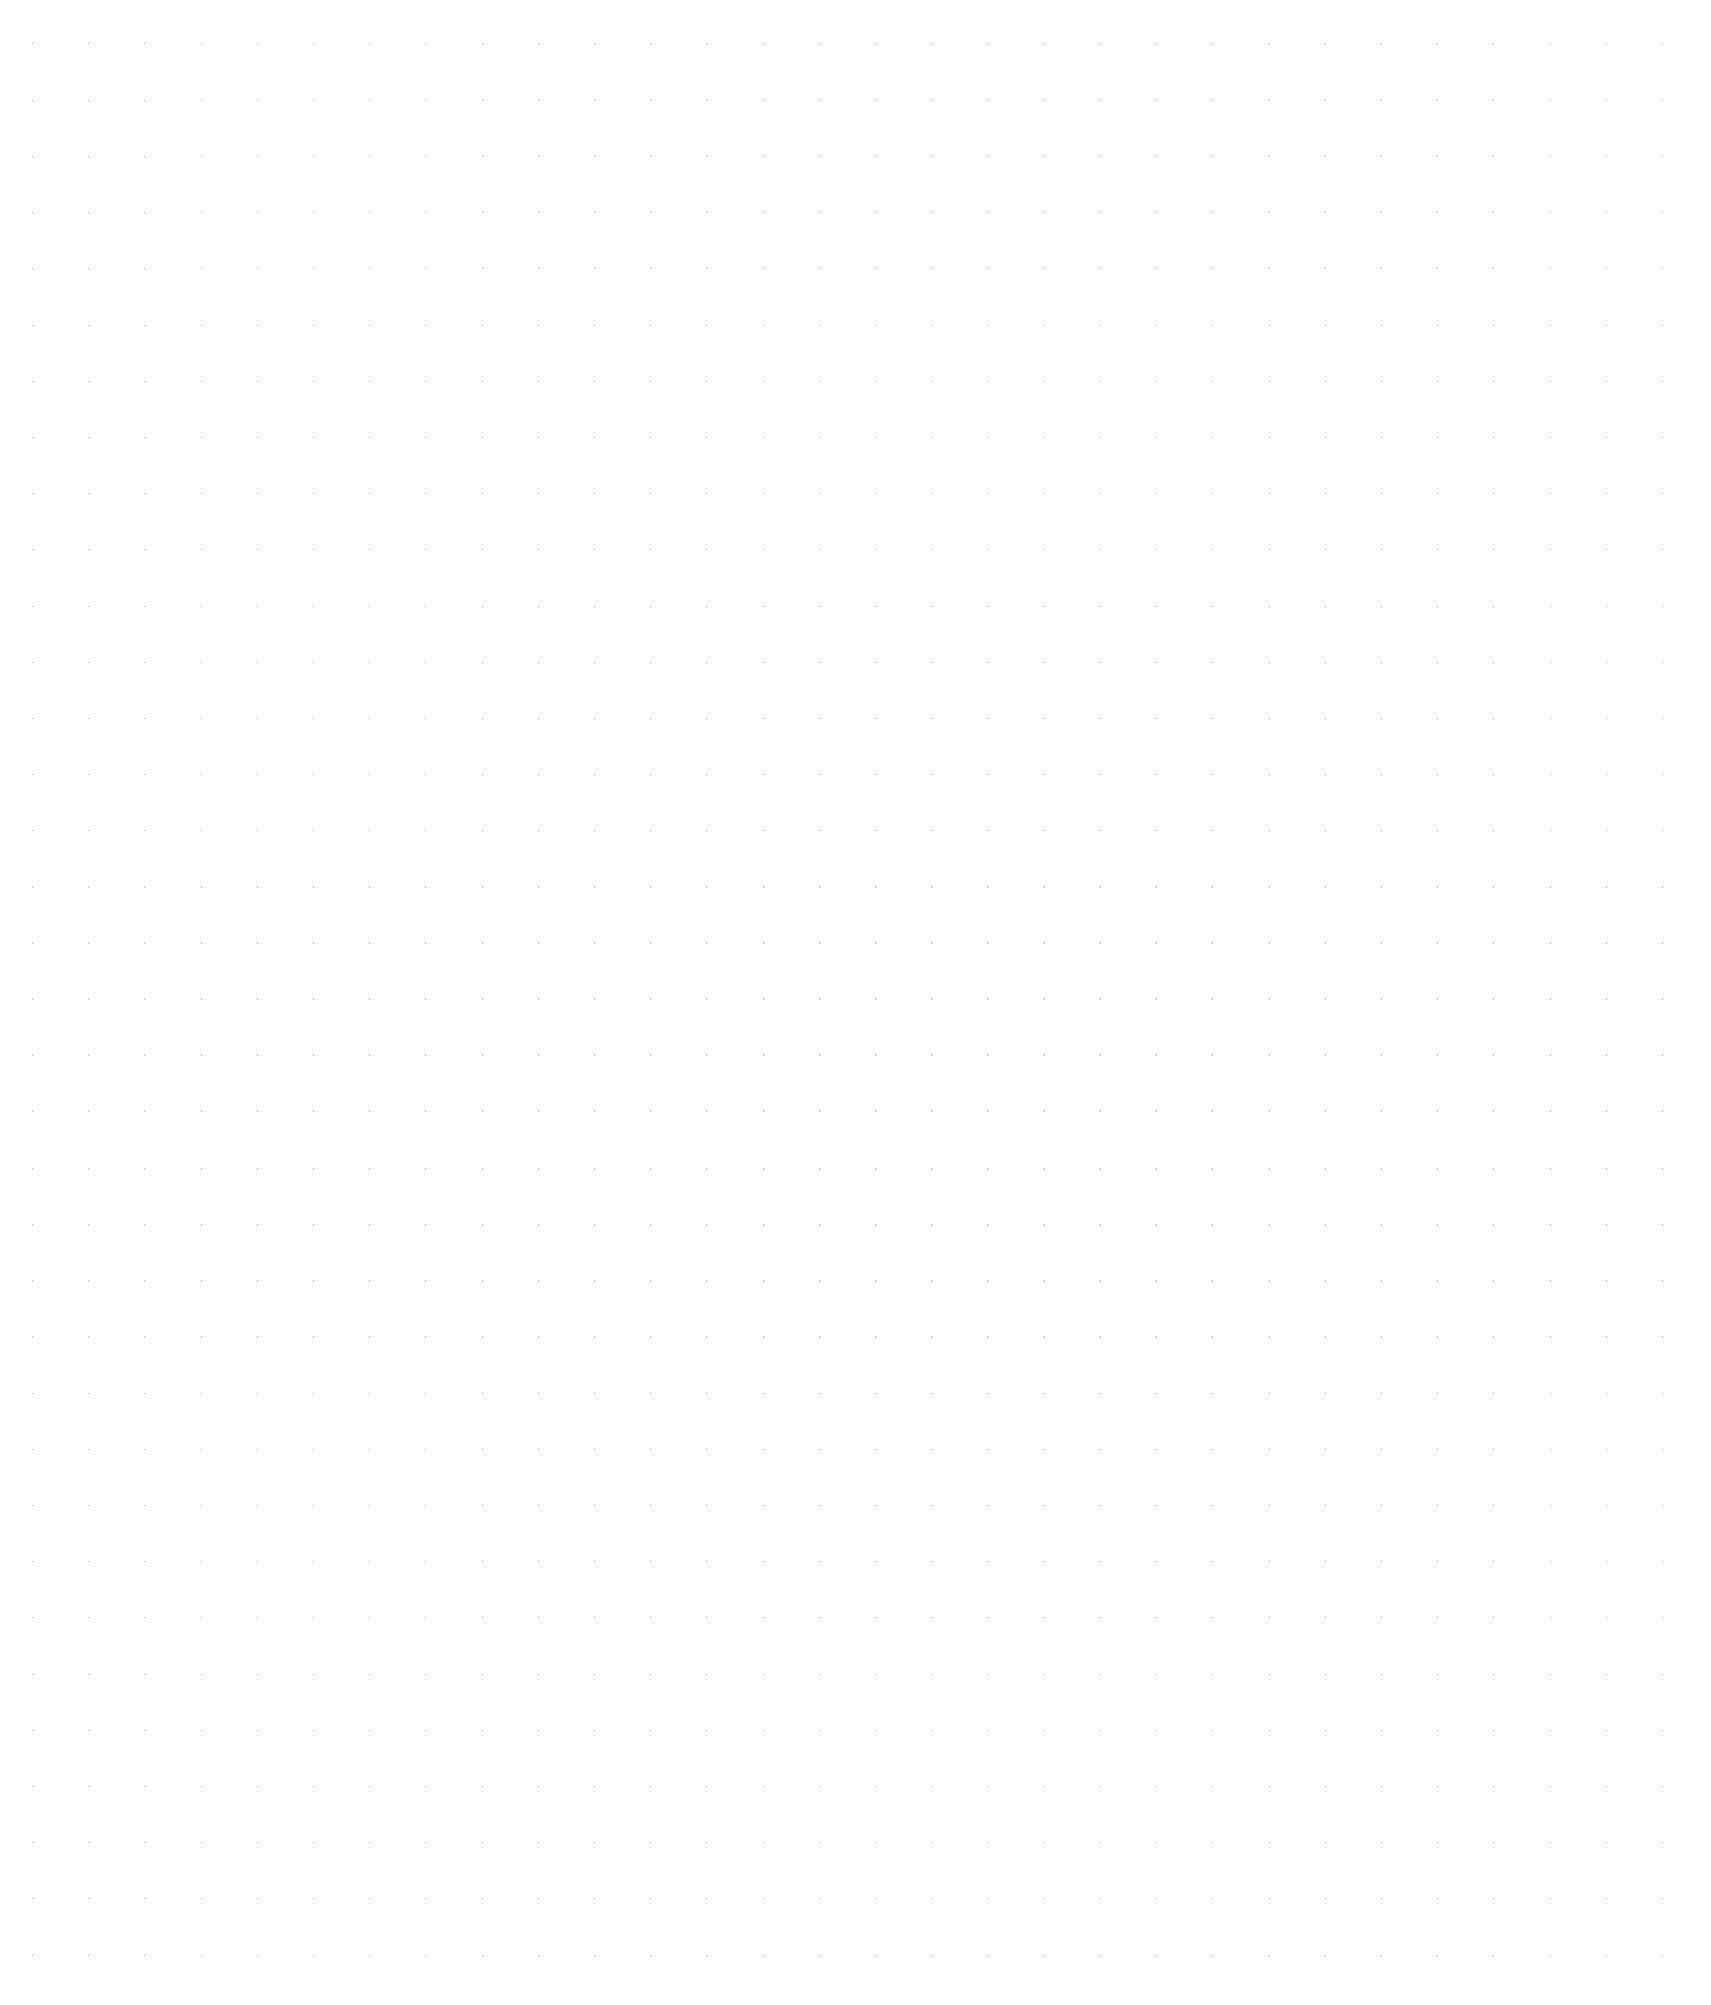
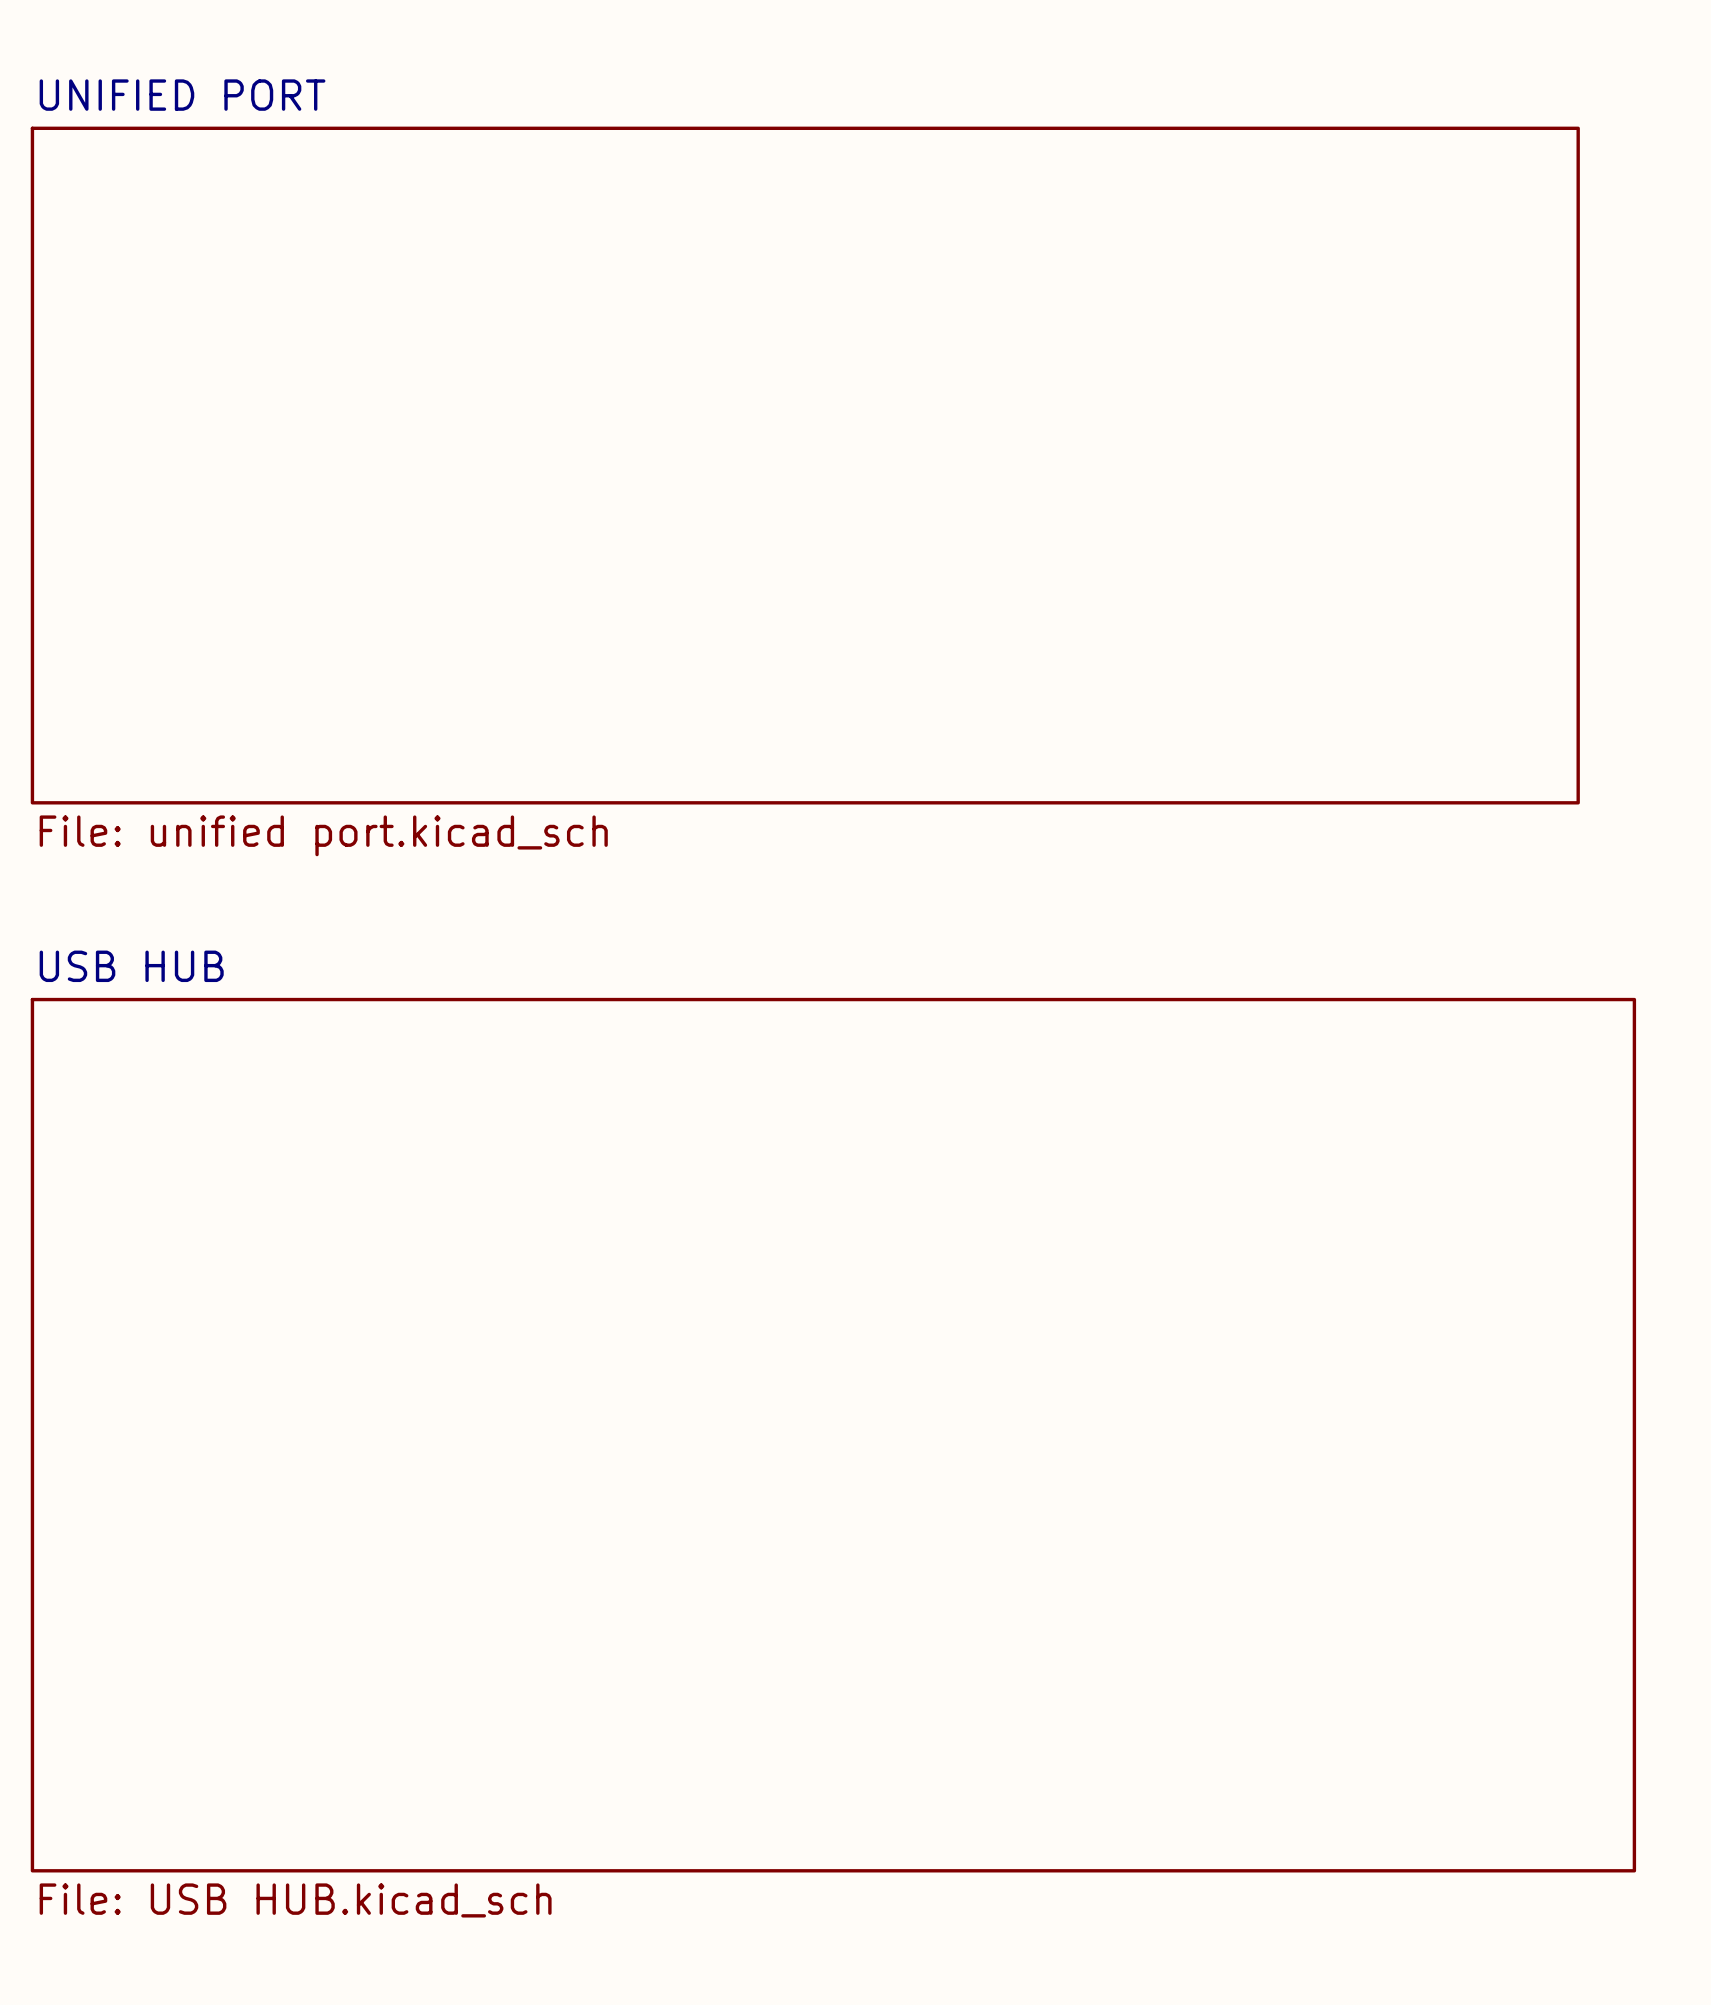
sheet UNIFIED PORT: none -> File: unified port.kicad_sch (805, 465)
sheet USB HUB: none -> File: USB HUB.kicad_sch (833, 1435)

